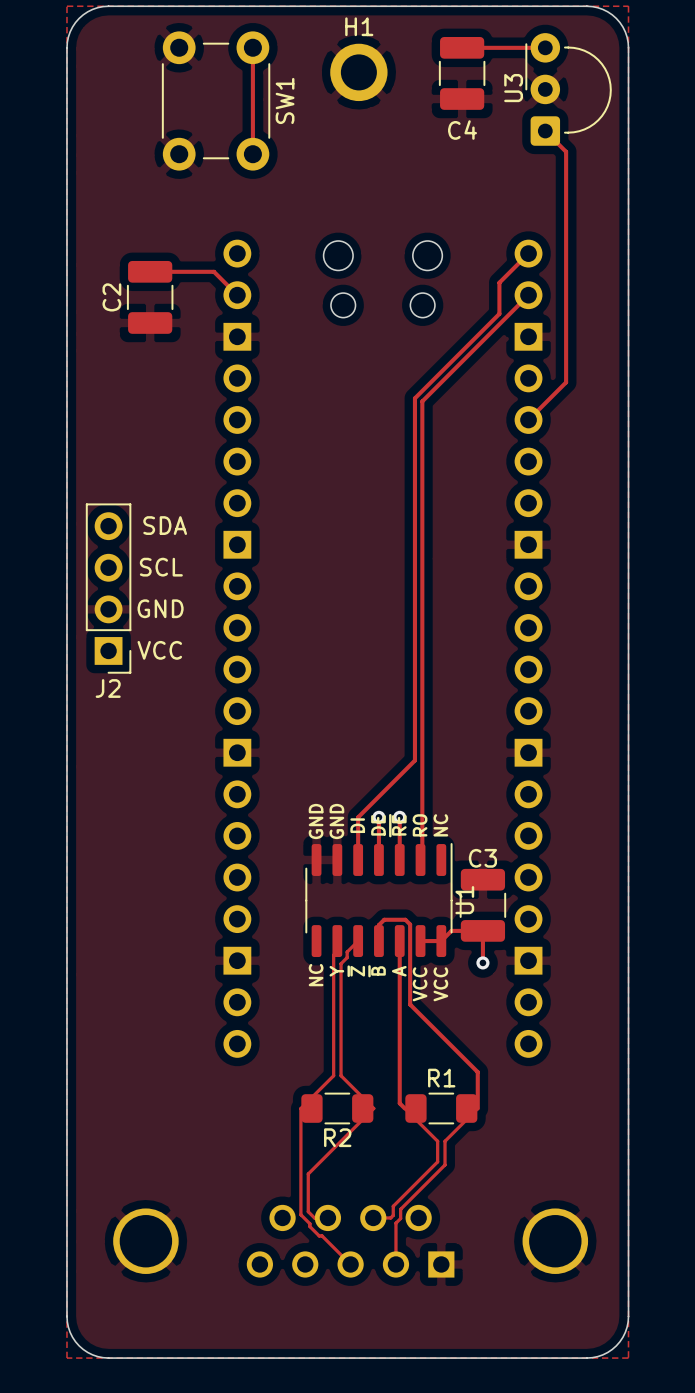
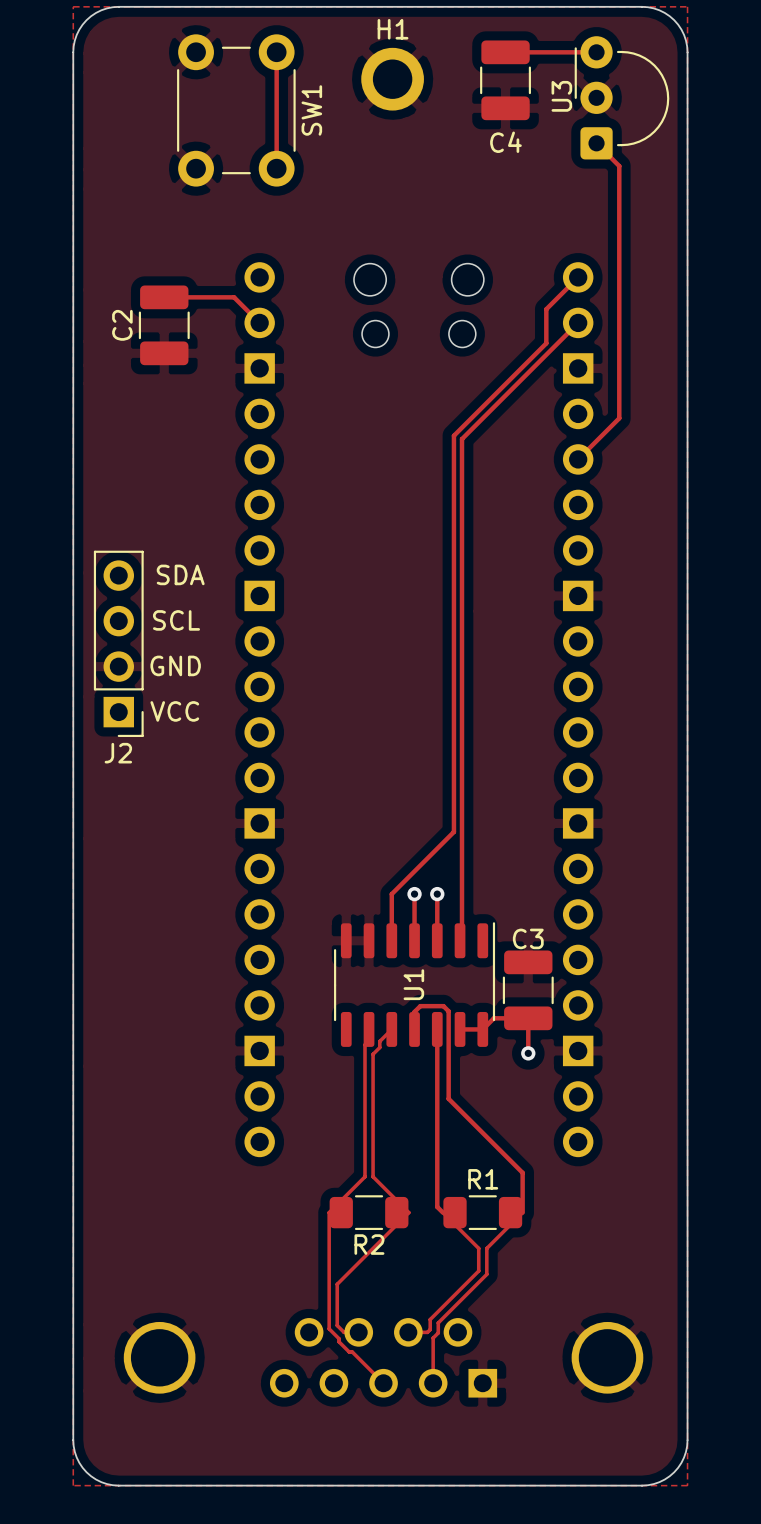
U1 footprint: [305, 843, 453, 958] -> [334, 922, 496, 1047]
U1 name position: U1 (464, 900) -> U1 (413, 984)

